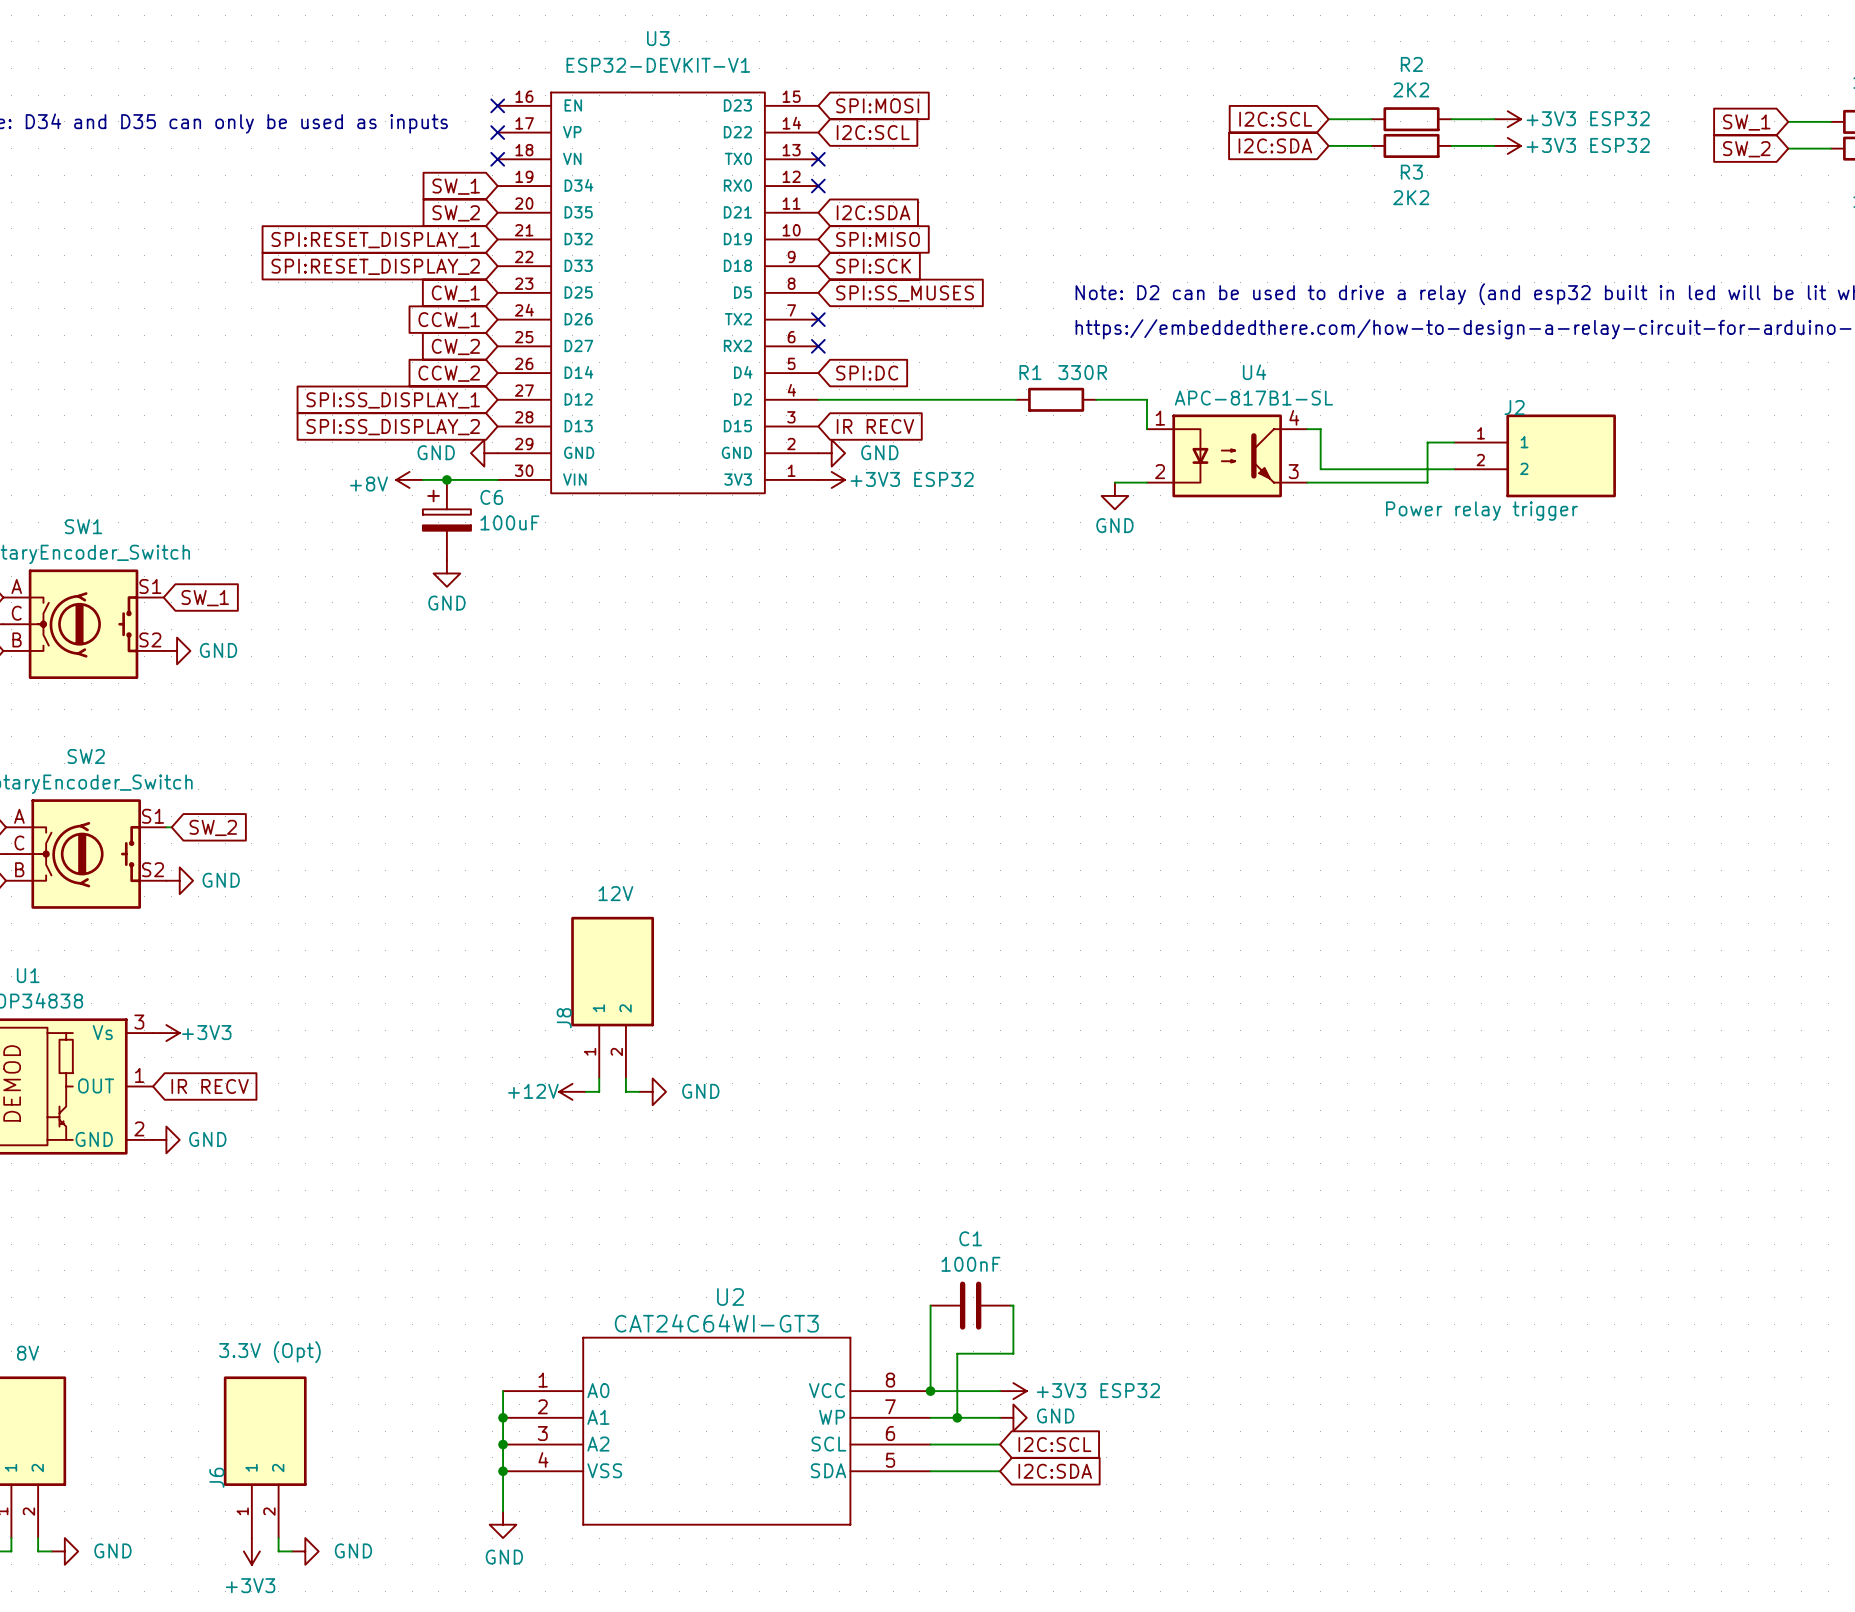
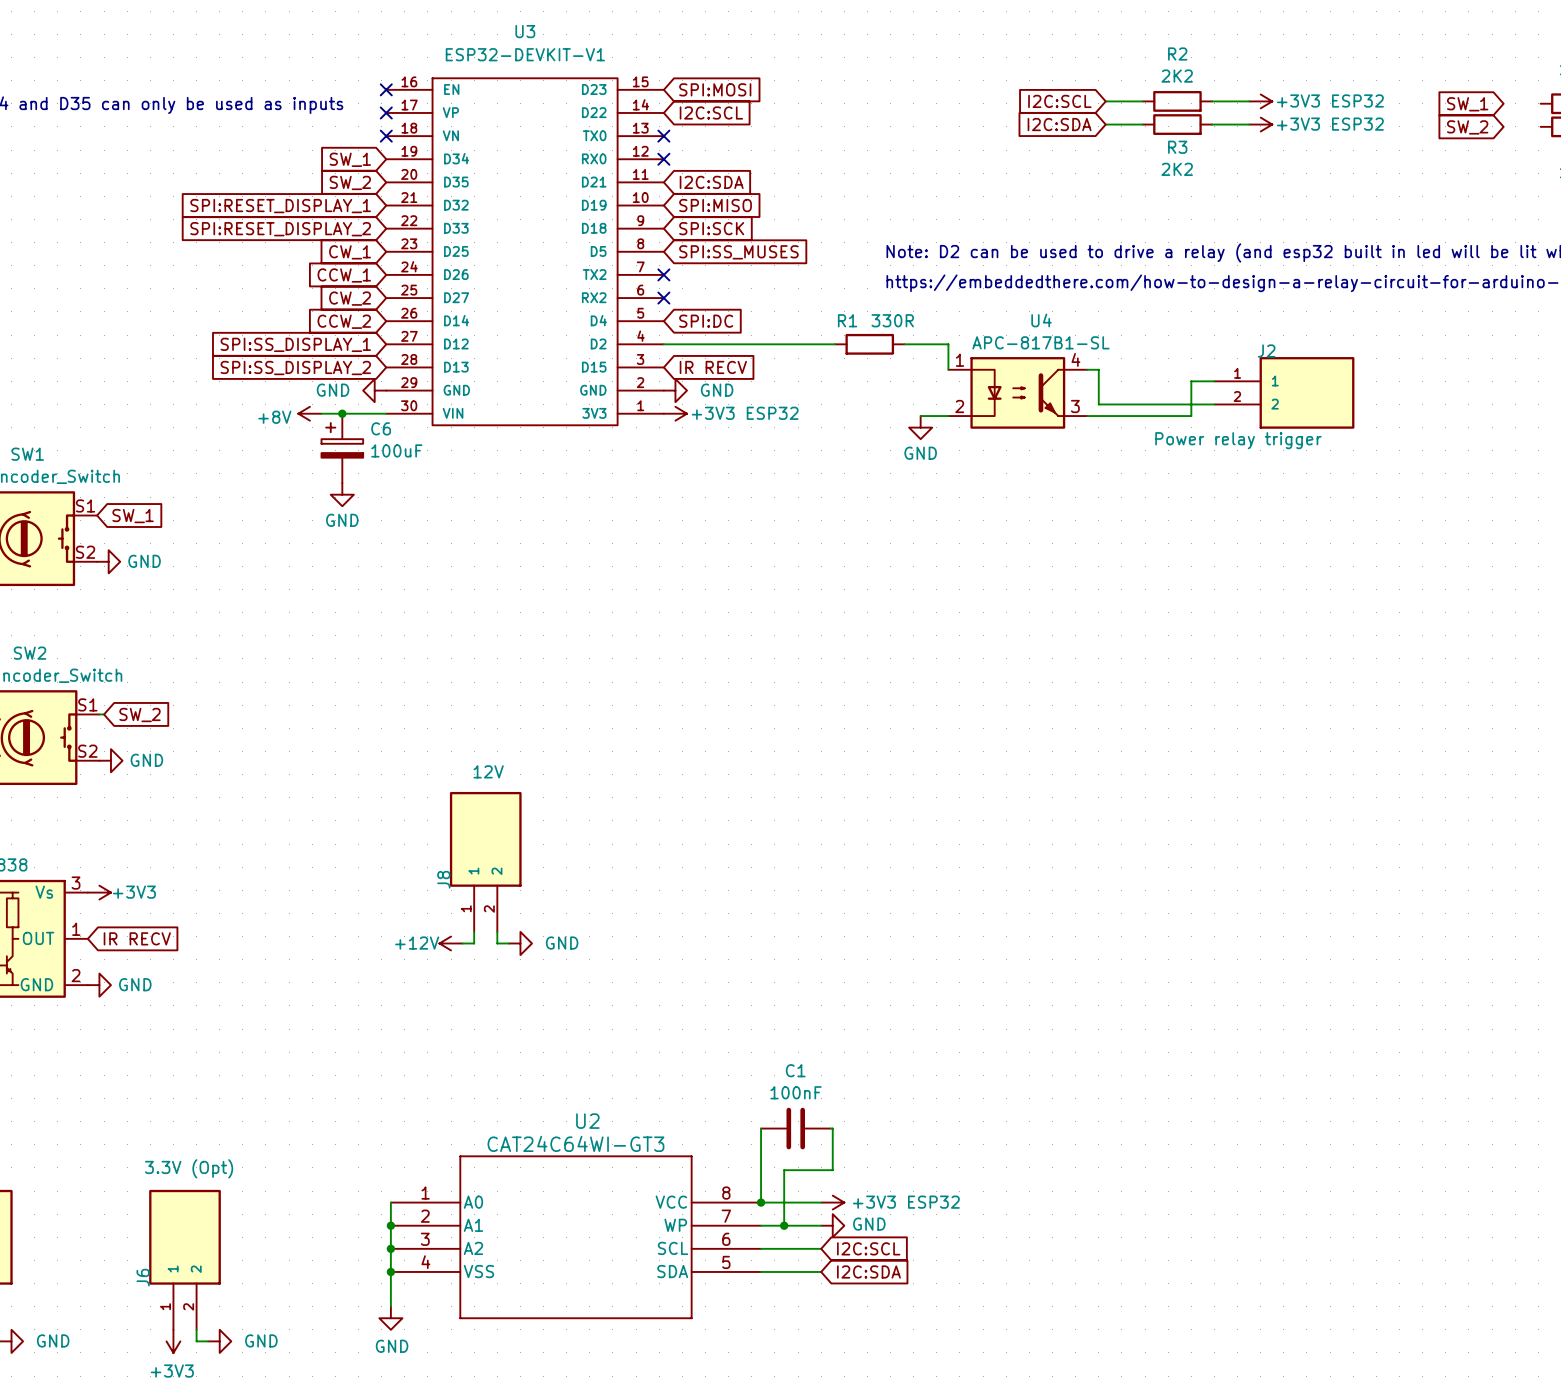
wire: (1788, 121) (1831, 121) -> none
wire: (1788, 148) (1831, 148) -> none

